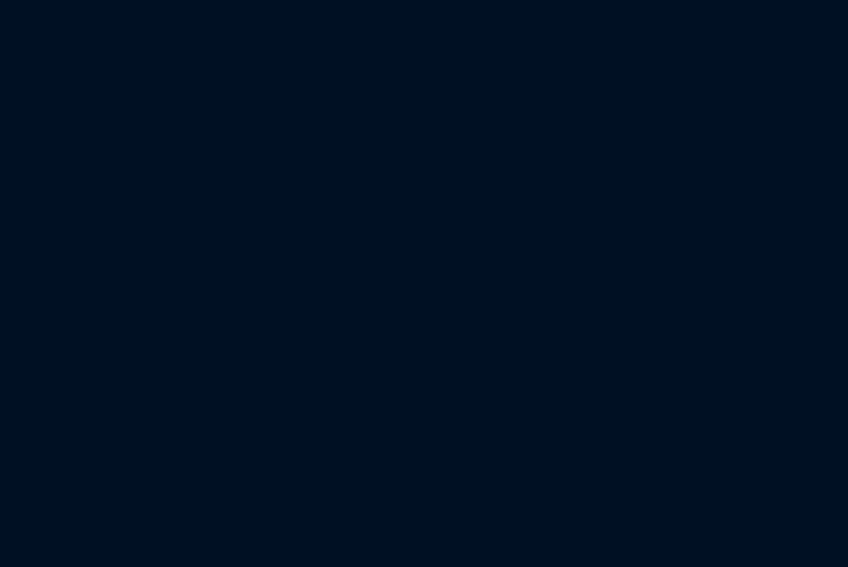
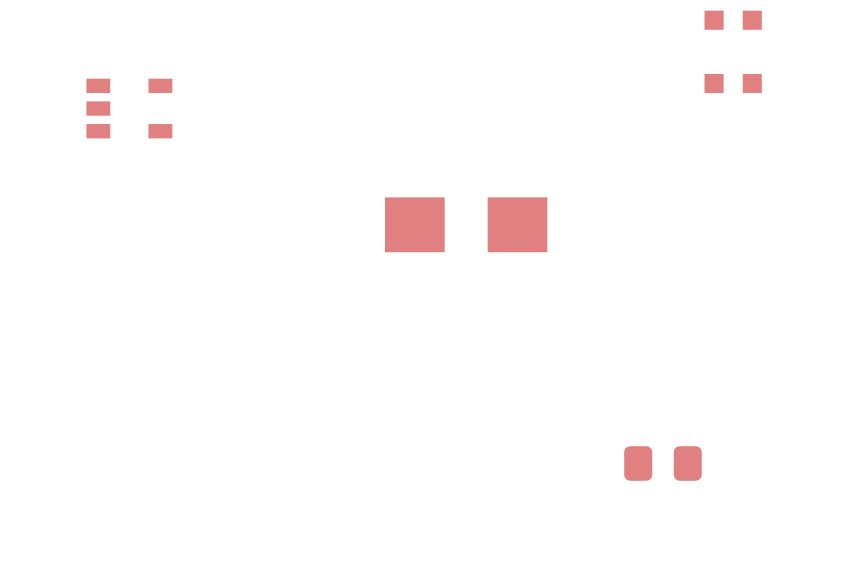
part: none -> (733, 20)
part: none -> (733, 83)
part: none -> (129, 108)
part: none -> (466, 224)
part: none -> (662, 463)

